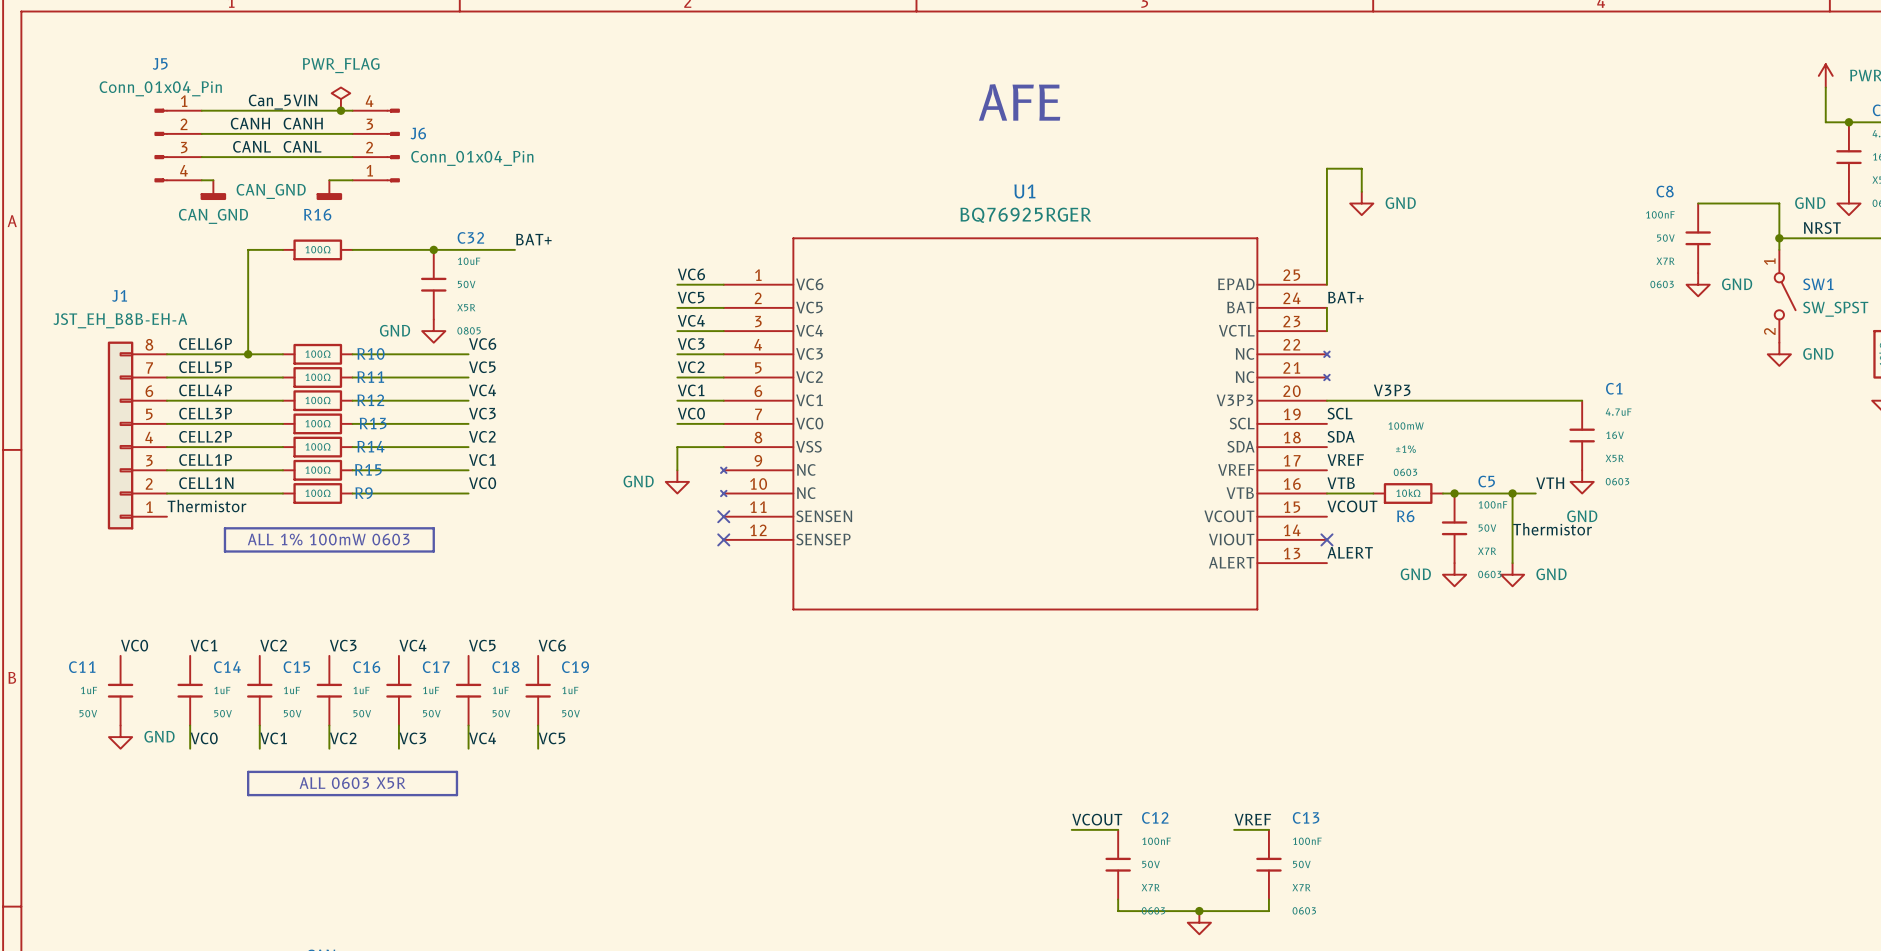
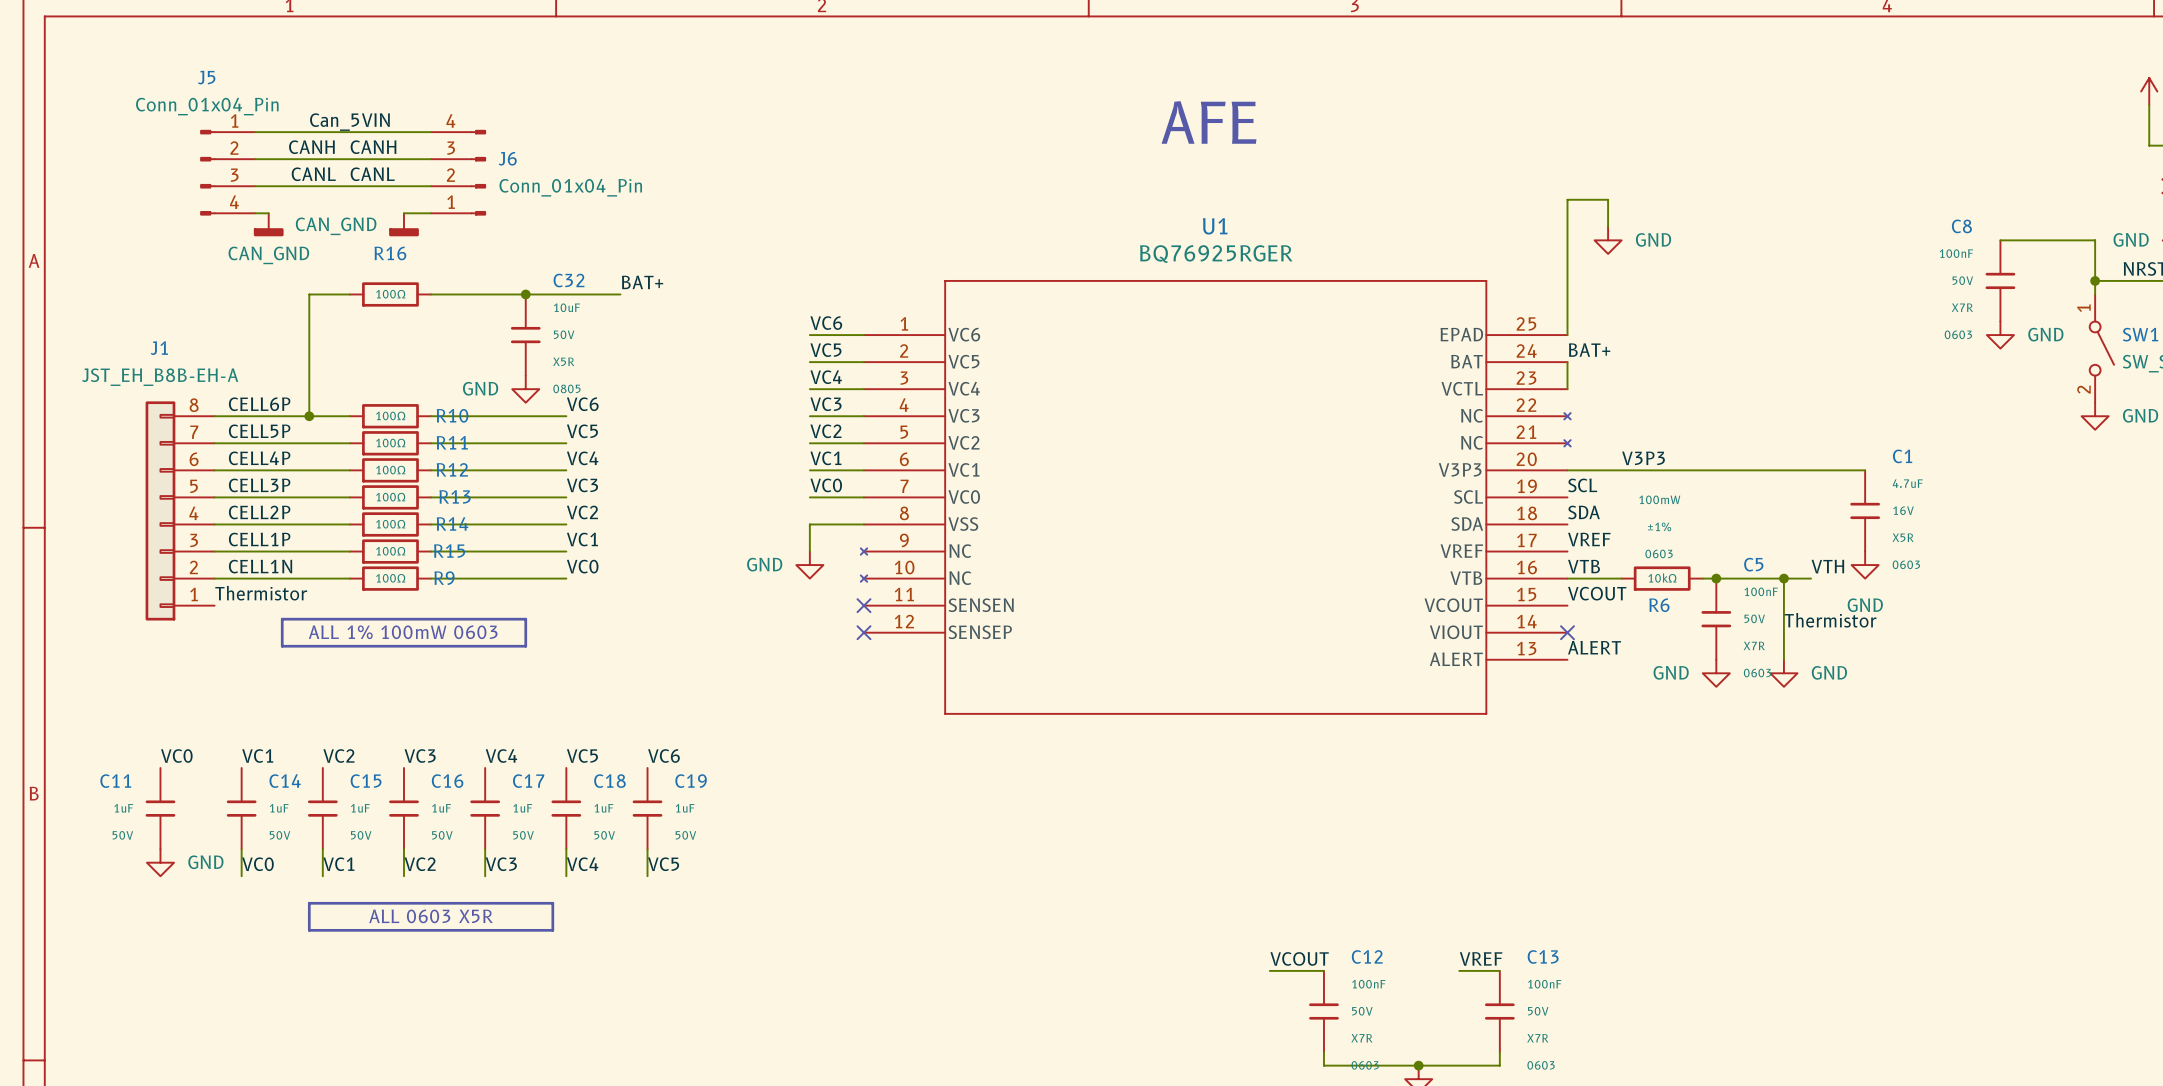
power symbol: PWR_FLAG (340, 99) -> none
junction: (340, 110) -> none

